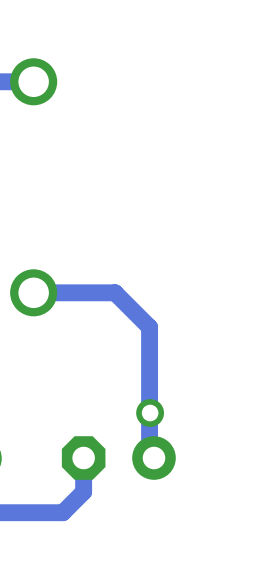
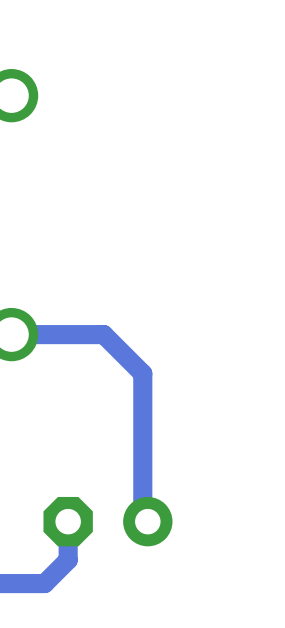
via: (150, 413) -> none

